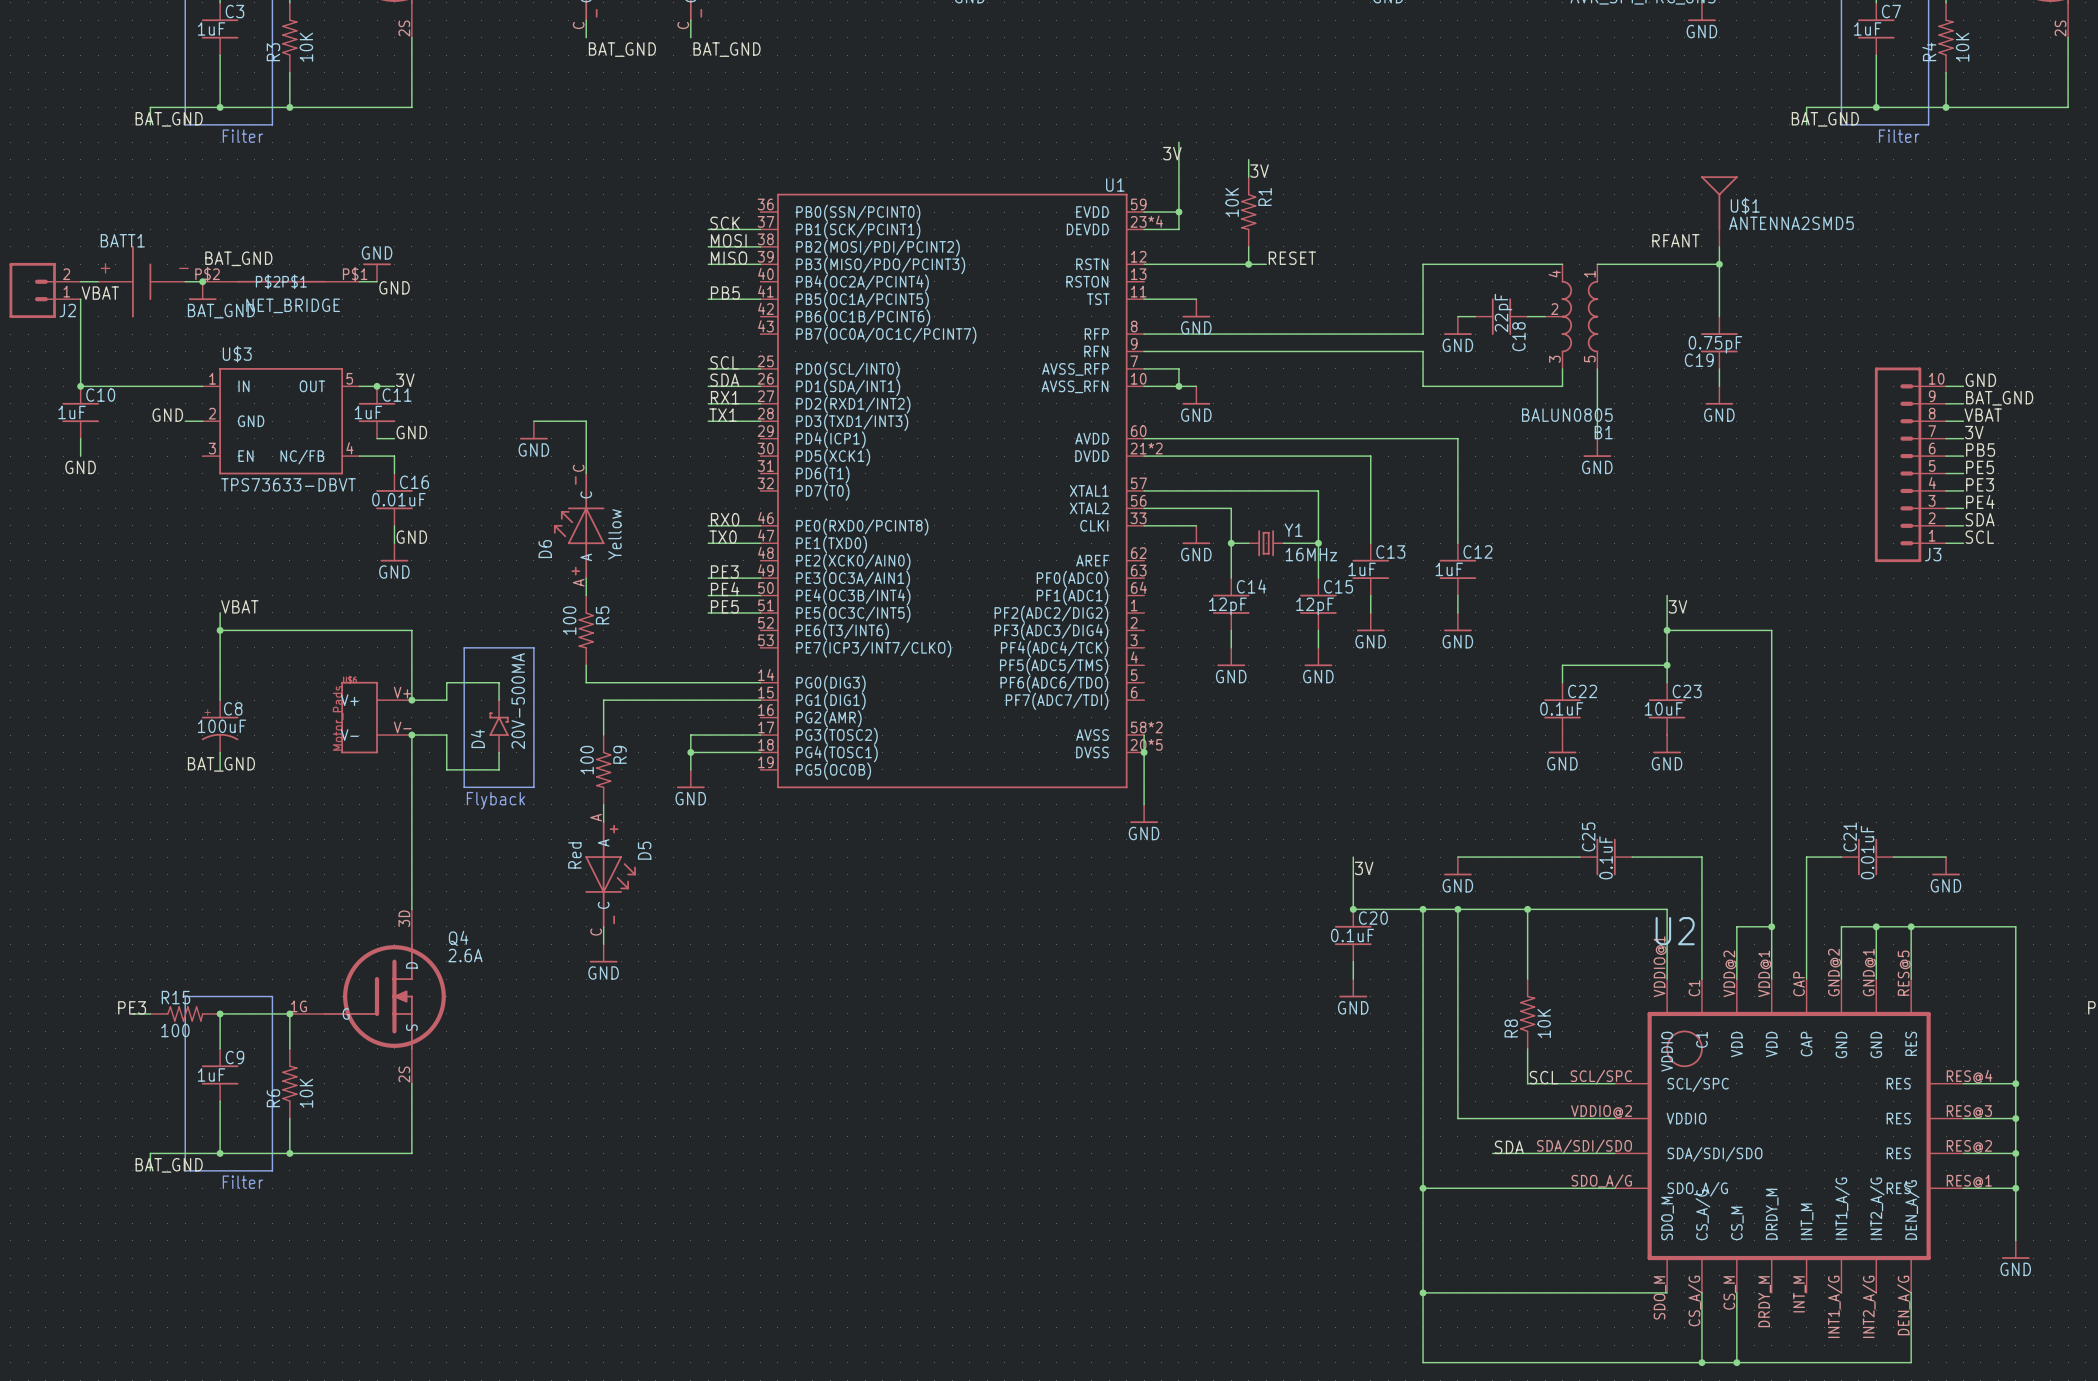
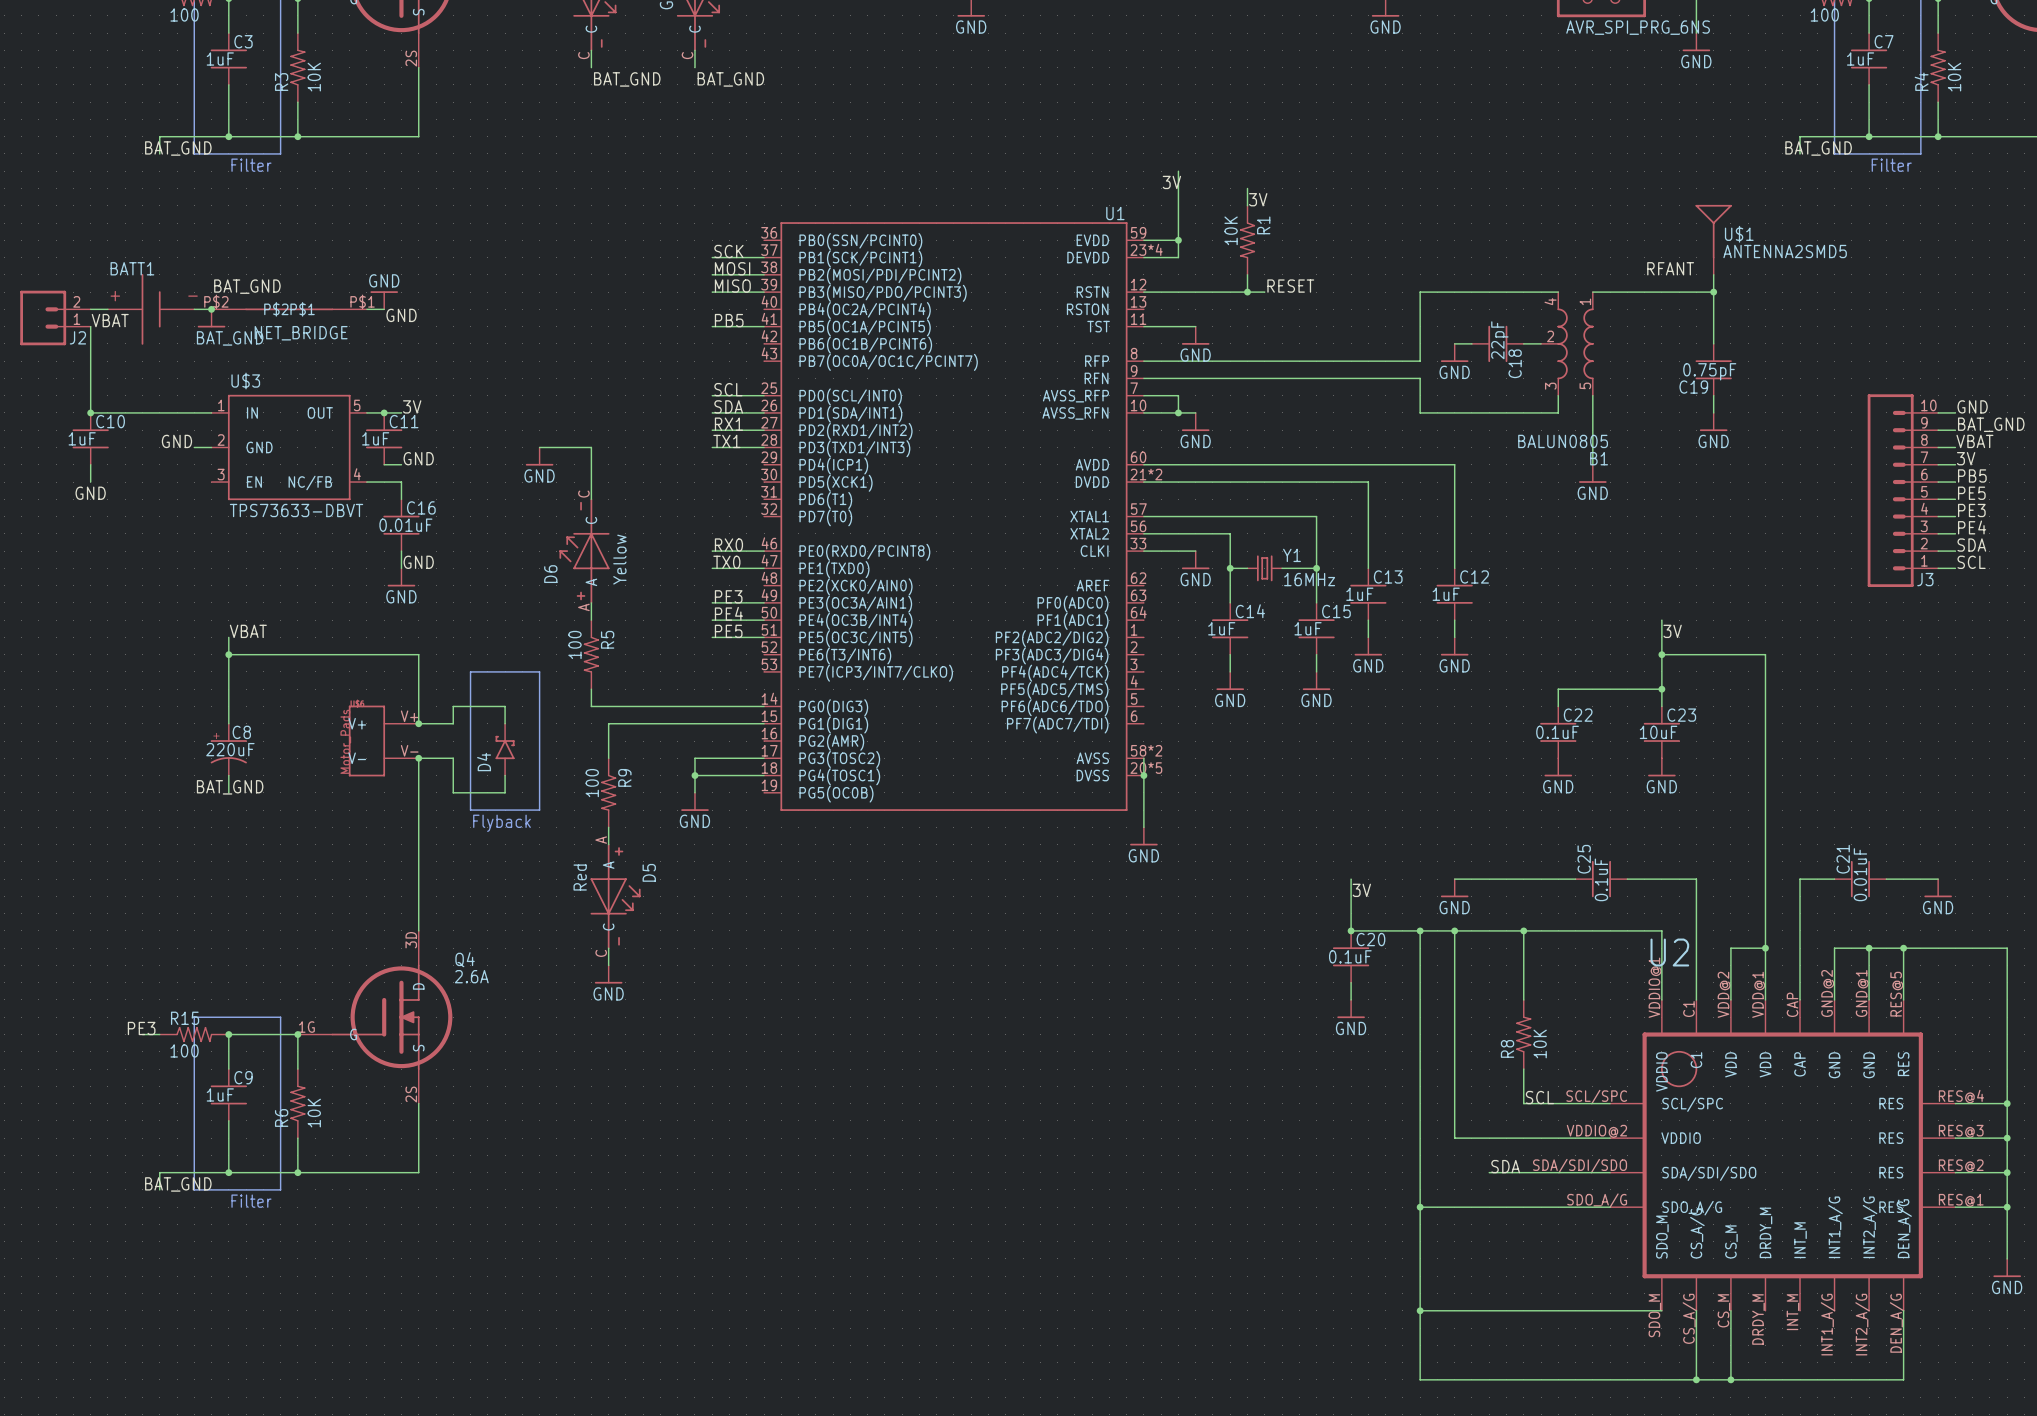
C14 value: 12pF (1227, 606) -> 1uF (1221, 628)
C15 value: 12pF (1315, 606) -> 1uF (1308, 628)
D4 value: 20V-500MA (518, 701) -> none
C8 value: 100uF (221, 726) -> 220uF (230, 749)

